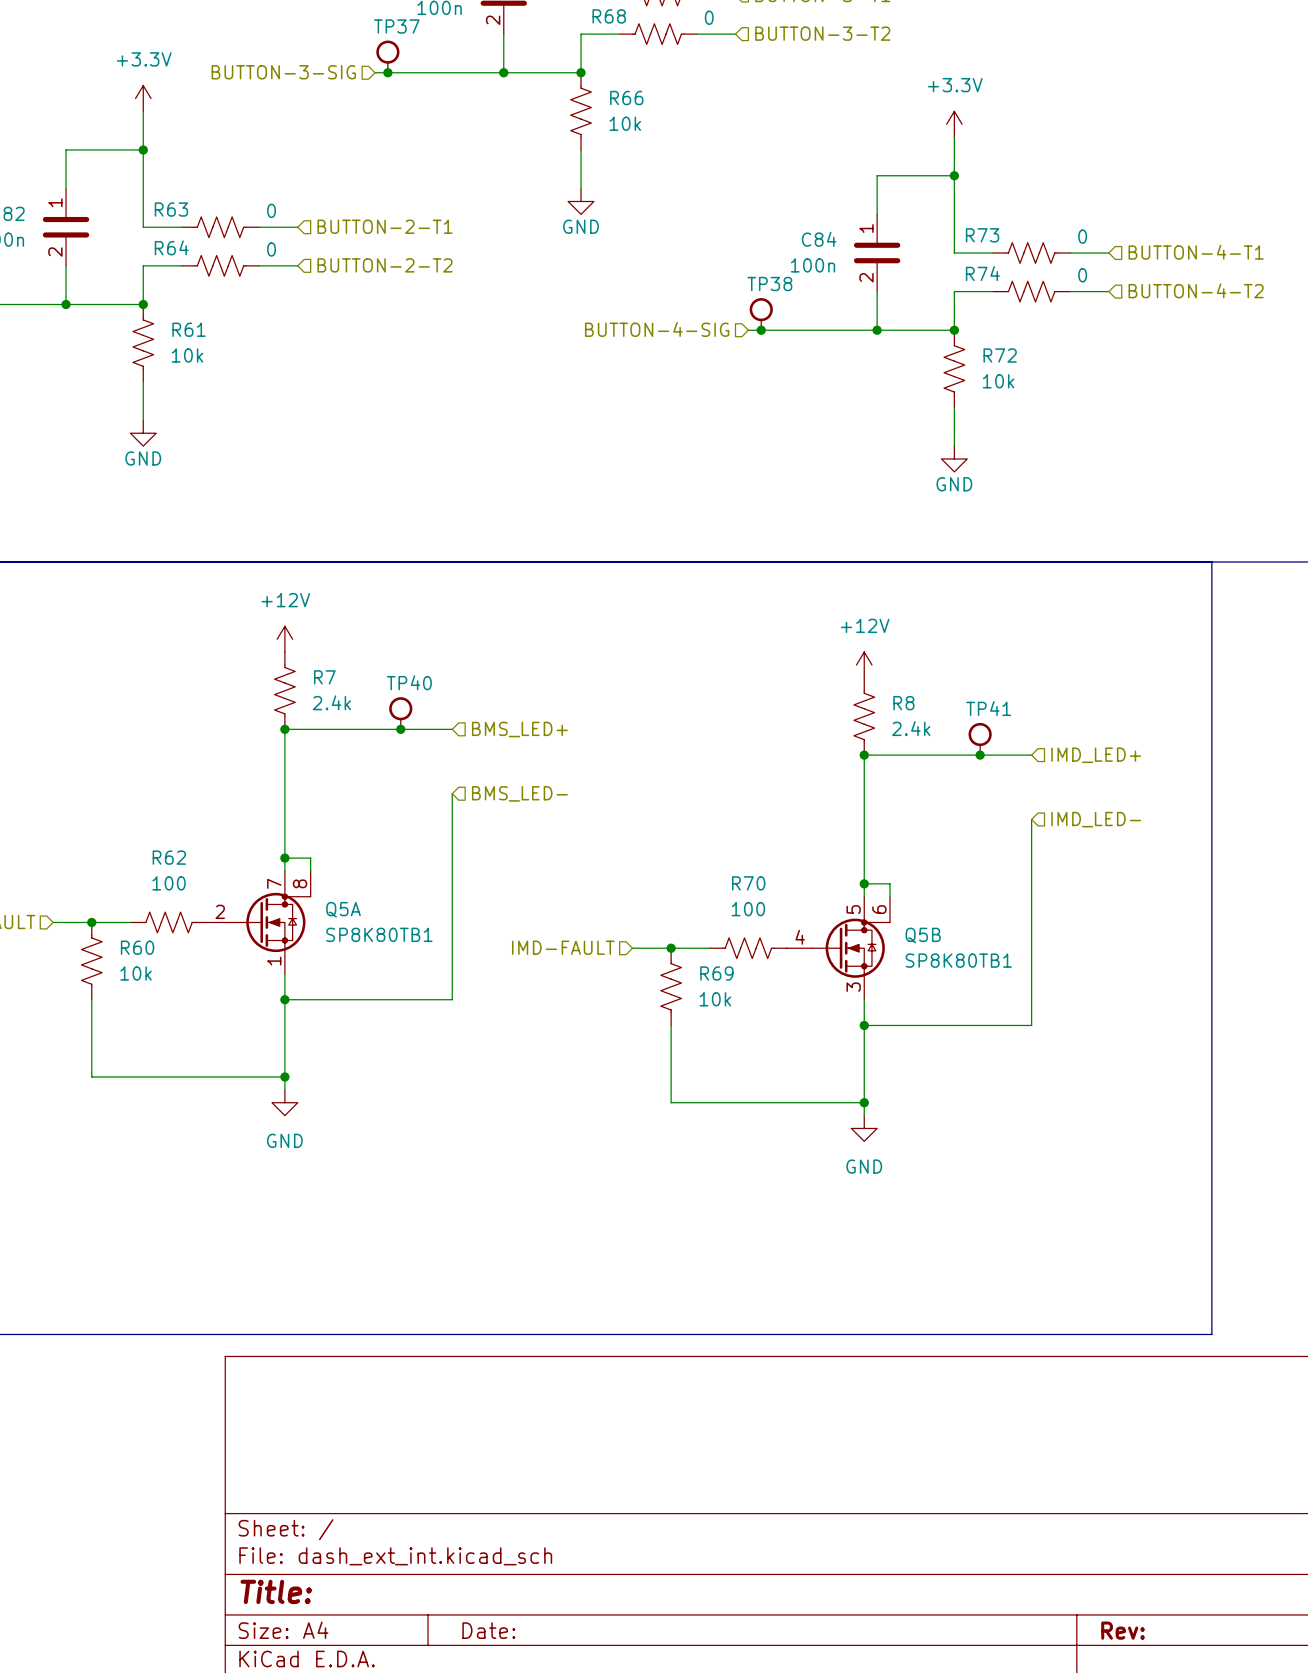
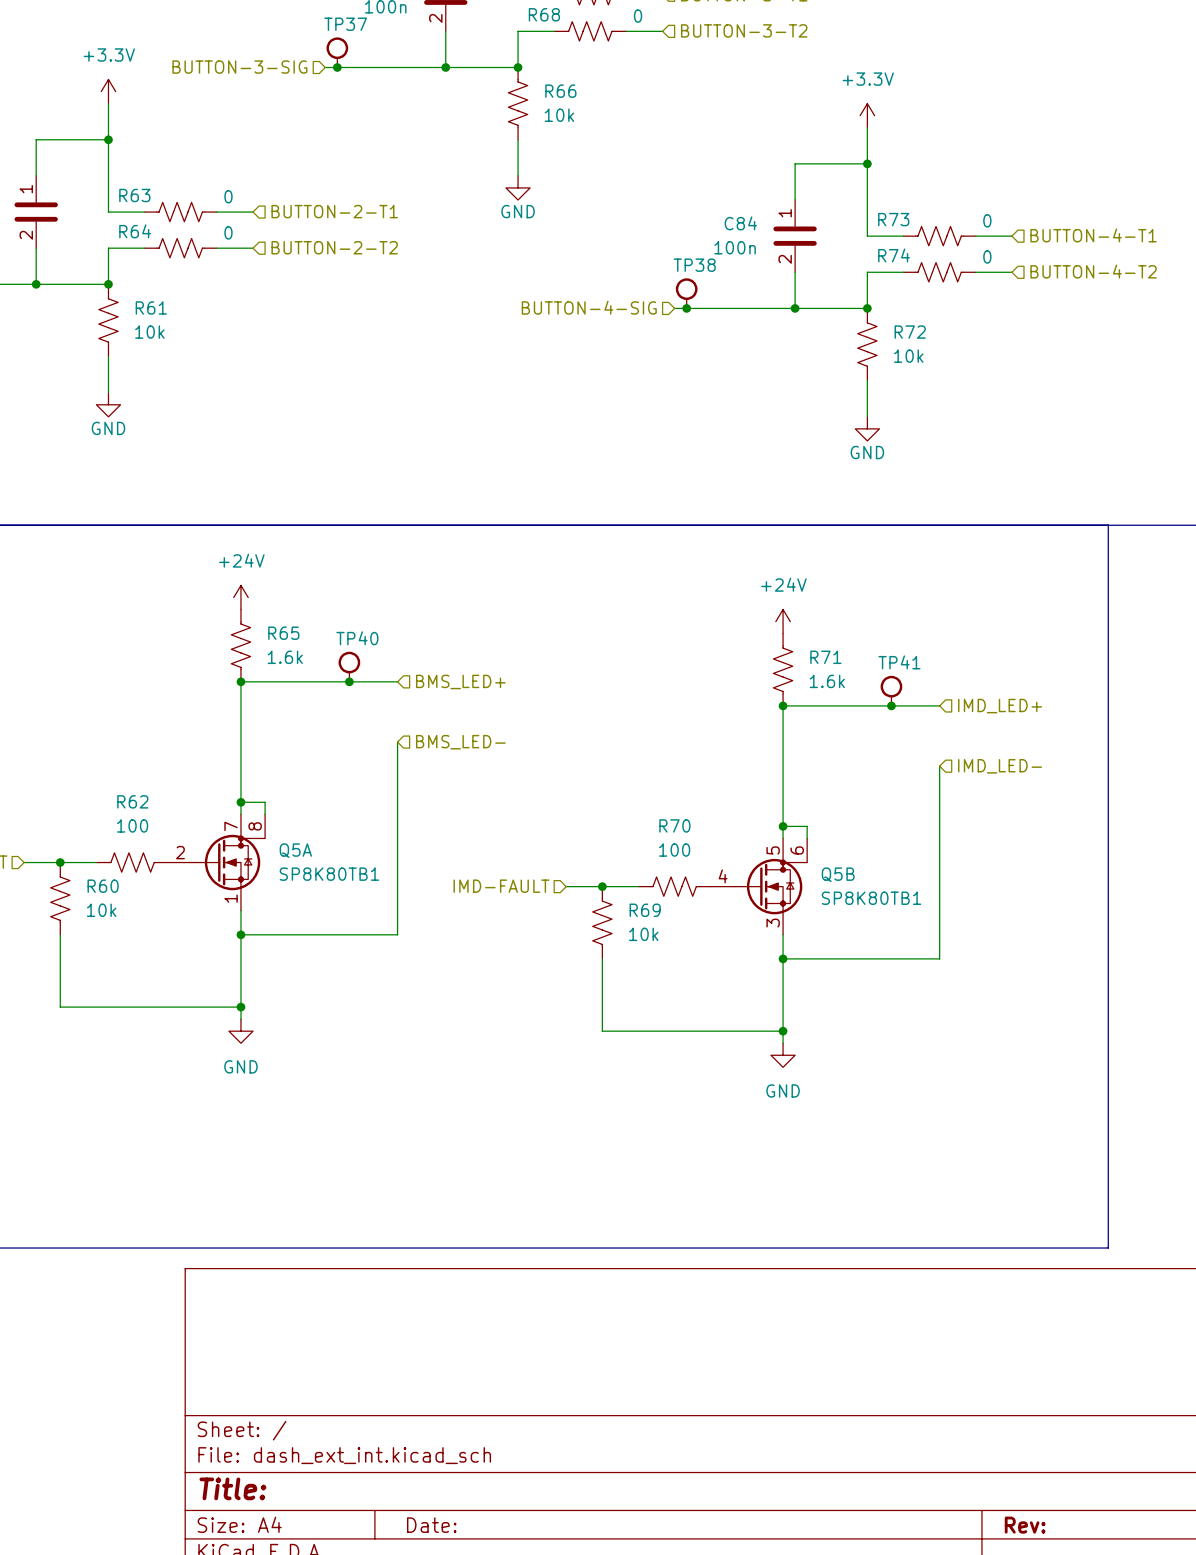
power symbol: +12V (284, 639) -> +24V (240, 597)
power symbol: +12V (864, 664) -> +24V (783, 621)
R7 name: R7 (324, 677) -> R65 (283, 633)
R7 value: 2.4k (331, 702) -> 1.6k (285, 657)
R8 name: R8 (903, 703) -> R71 (825, 657)
R8 value: 2.4k (911, 728) -> 1.6k (827, 681)

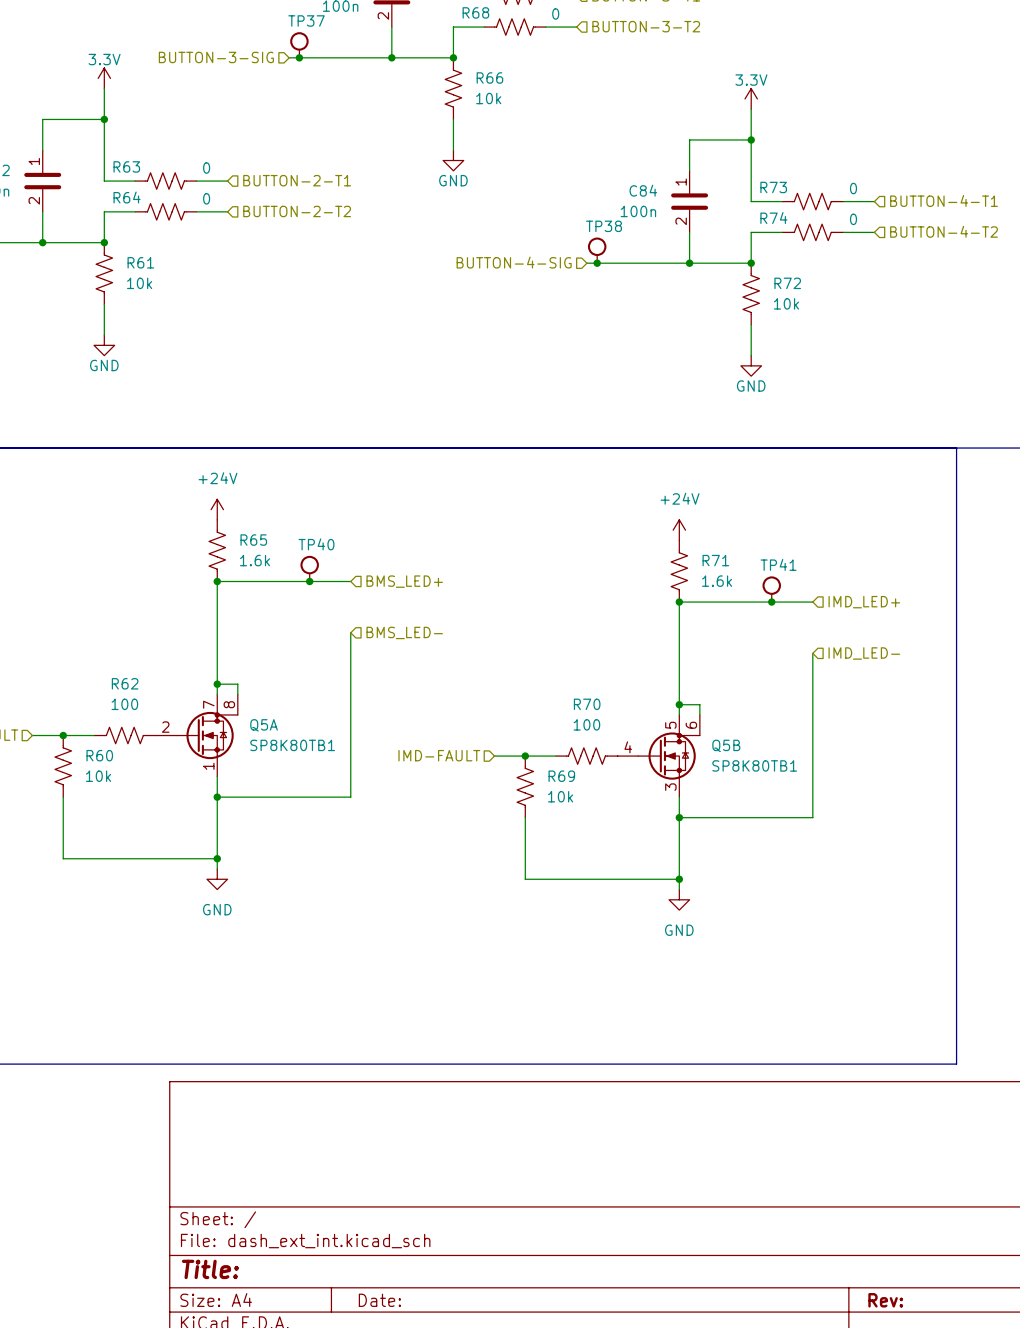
power symbol: +3.3V (108, 91) -> 3.3V (104, 78)
power symbol: +3.3V (867, 115) -> 3.3V (751, 98)

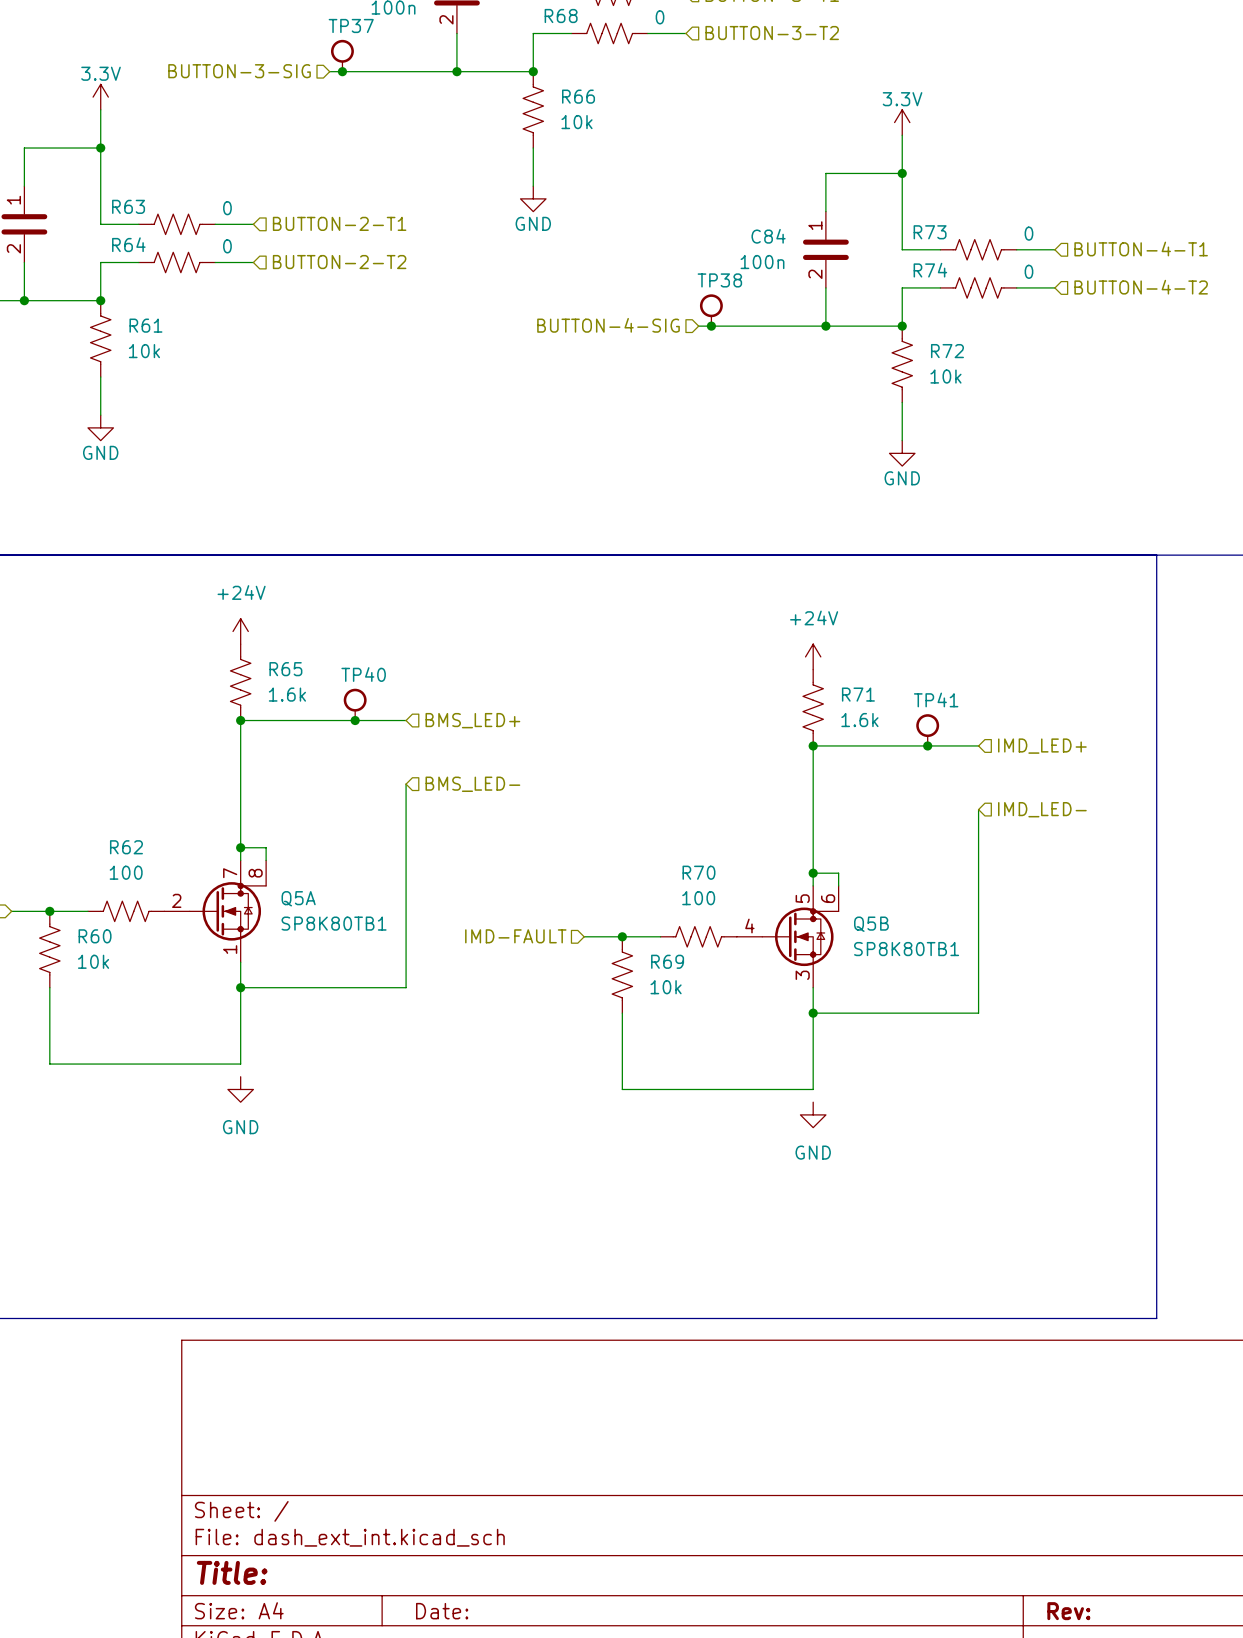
wire: (217, 858) (217, 869) -> none
junction: (217, 858) -> none
wire: (679, 879) (679, 889) -> none
junction: (679, 879) -> none

